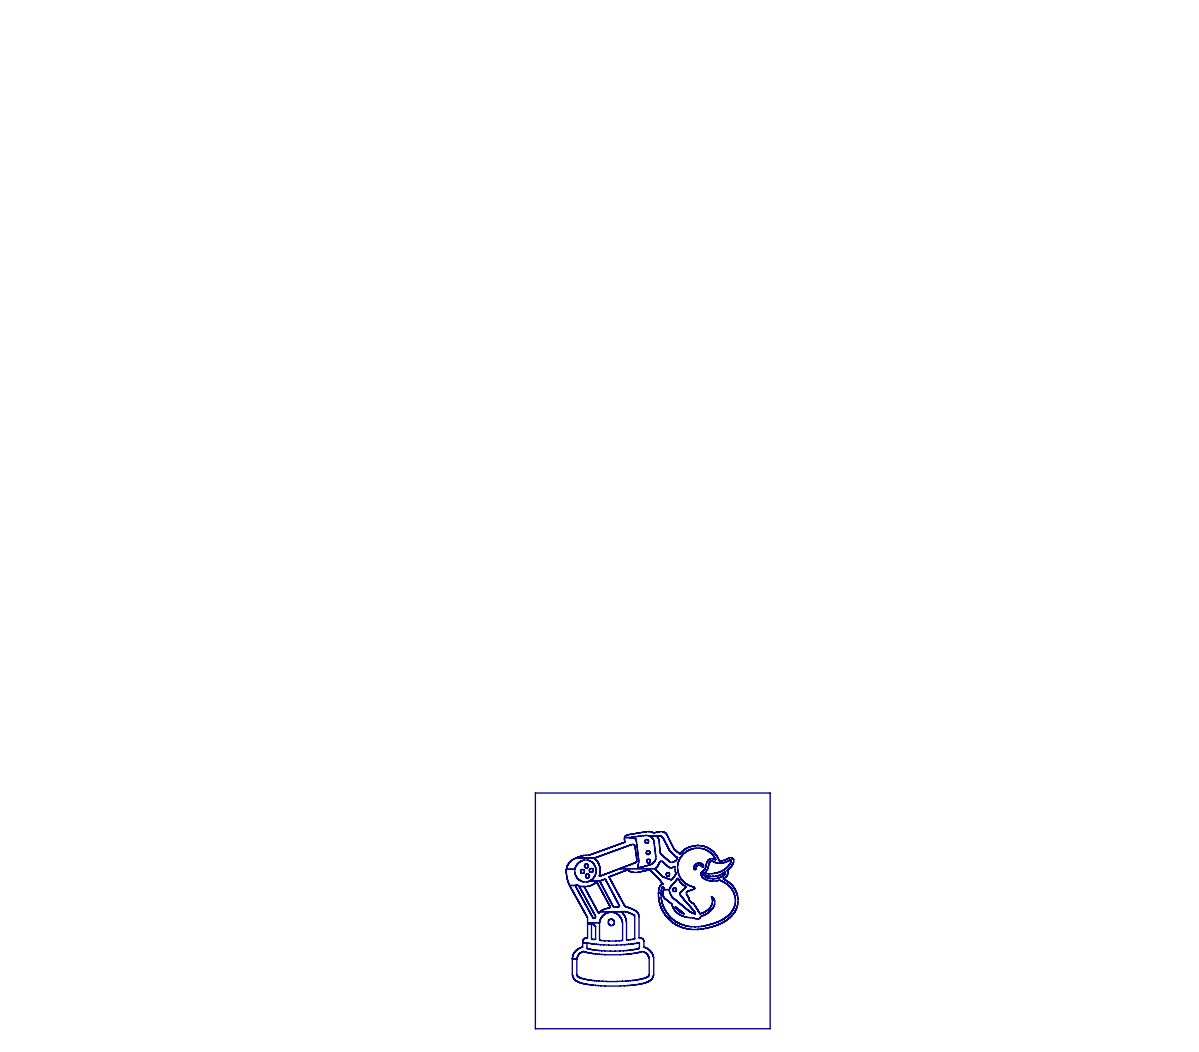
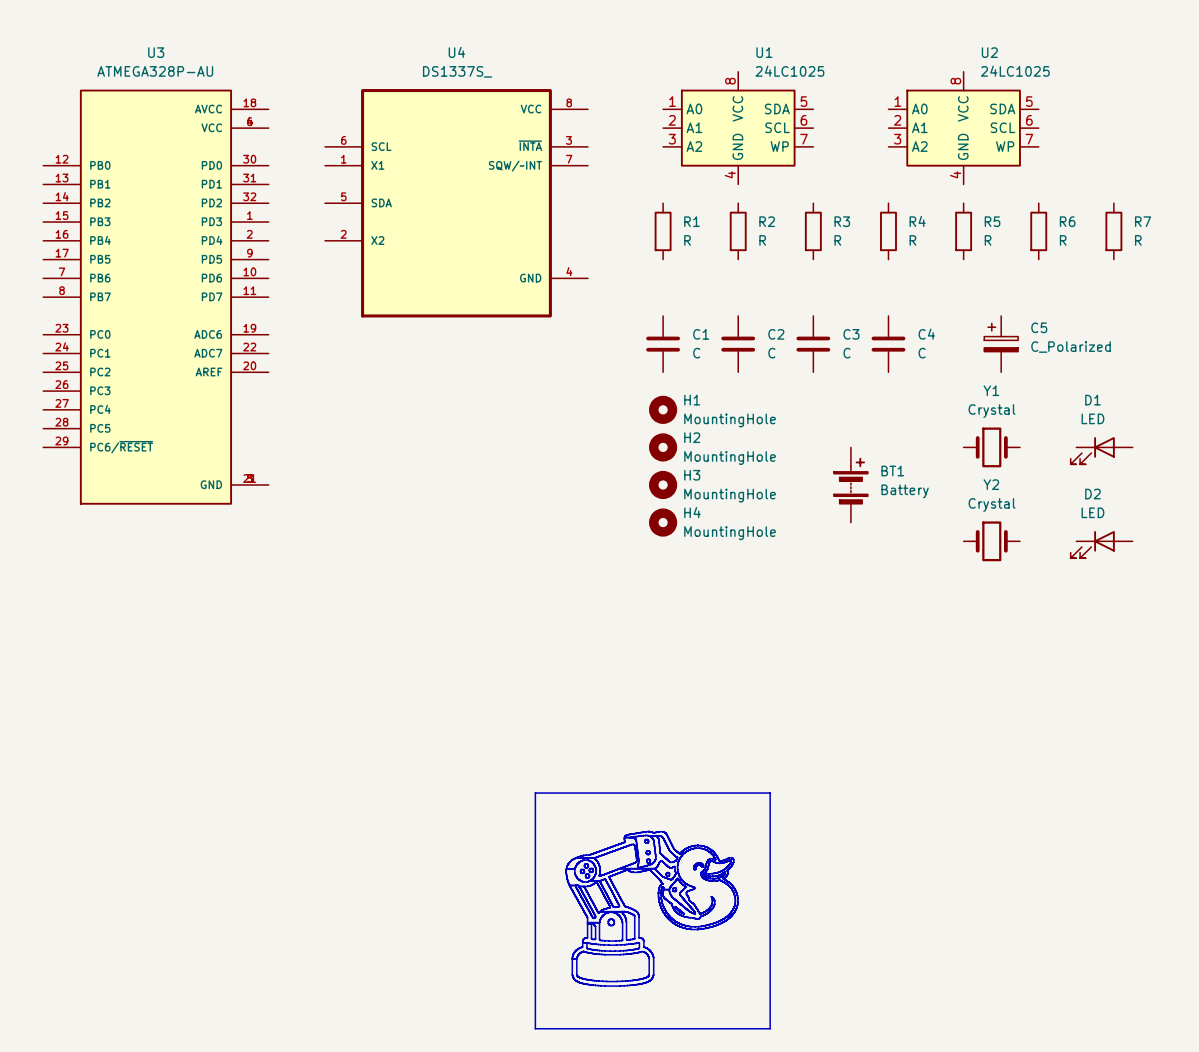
U1: none -> 24LC1025 (738, 128)
U2: none -> 24LC1025 (963, 128)
U4: none -> DS1337S_ (456, 203)
R1: none -> R (663, 231)
R2: none -> R (738, 231)
R3: none -> R (813, 231)
R4: none -> R (888, 231)
R5: none -> R (963, 231)
R6: none -> R (1038, 231)
R7: none -> R (1113, 231)
U3: none -> ATMEGA328P-AU (155, 297)
C1: none -> C (663, 344)
C2: none -> C (738, 344)
C3: none -> C (813, 344)
C4: none -> C (888, 344)
C5: none -> C_Polarized (1001, 344)
H1: none -> MountingHole (663, 409)
H2: none -> MountingHole (663, 447)
Y1: none -> Crystal (991, 447)
D1: none -> LED (1101, 450)
H3: none -> MountingHole (663, 484)
BT1: none -> Battery (850, 484)
H4: none -> MountingHole (663, 522)
Y2: none -> Crystal (991, 541)
D2: none -> LED (1101, 544)

